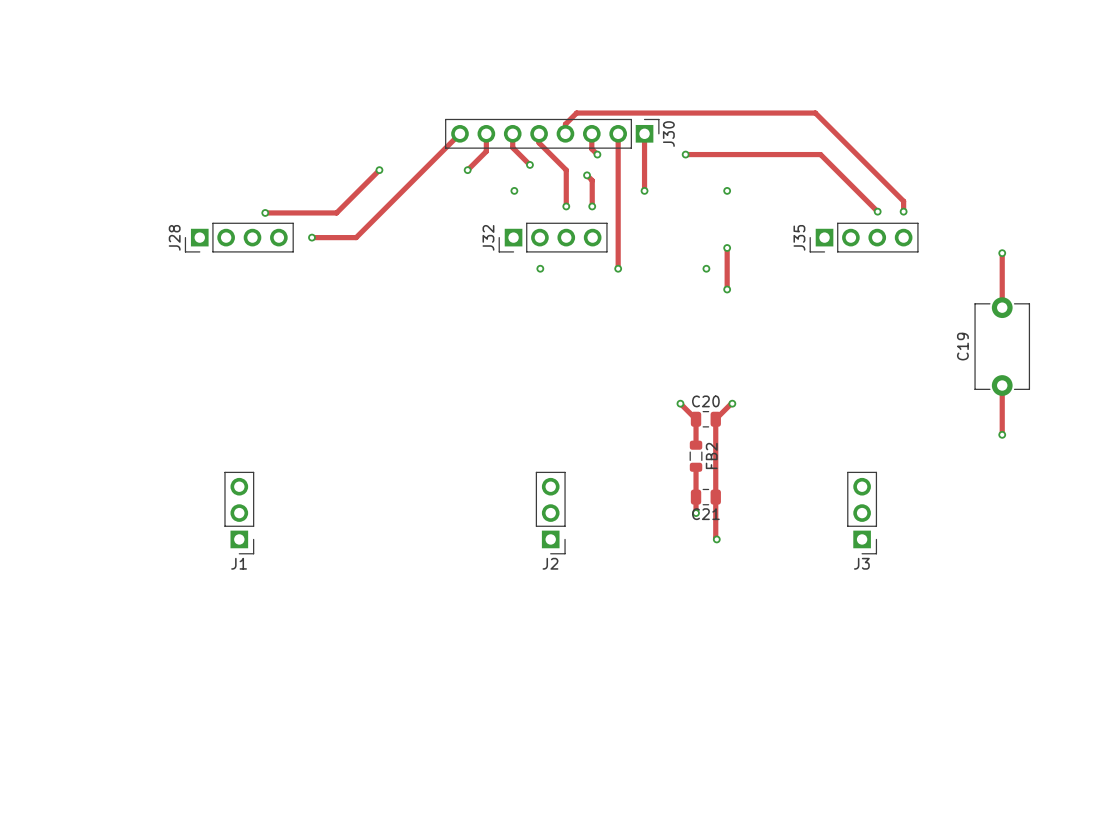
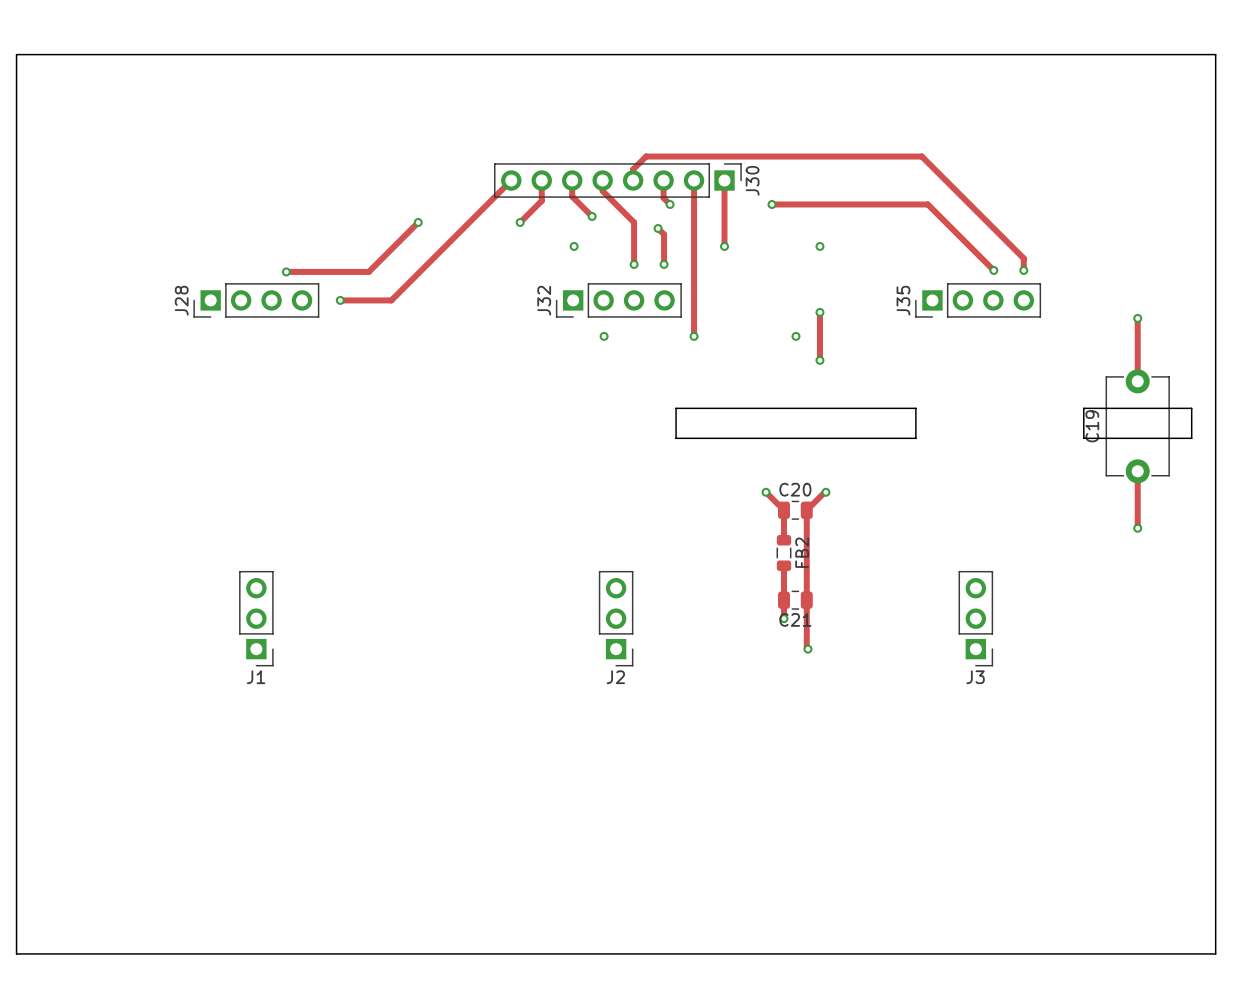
board edge: none -> (16, 54) (1215, 54) (1215, 953) (16, 953) (16, 54)
board edge: none -> (676, 408) (915, 408) (915, 438) (676, 438) (676, 408)
board edge: none -> (1083, 408) (1191, 408) (1191, 438) (1083, 438) (1083, 408)

